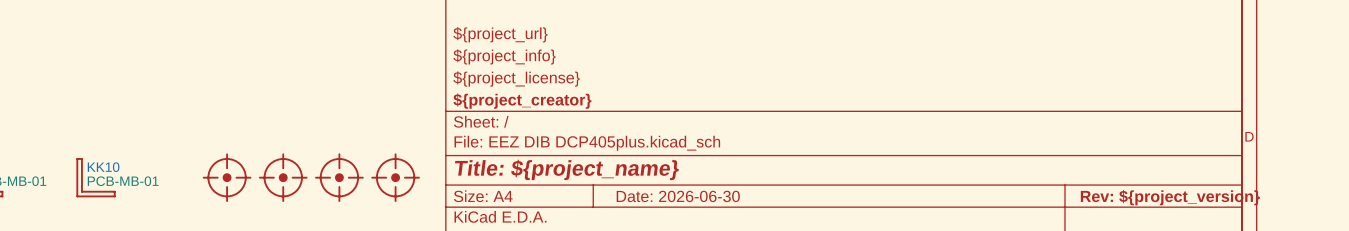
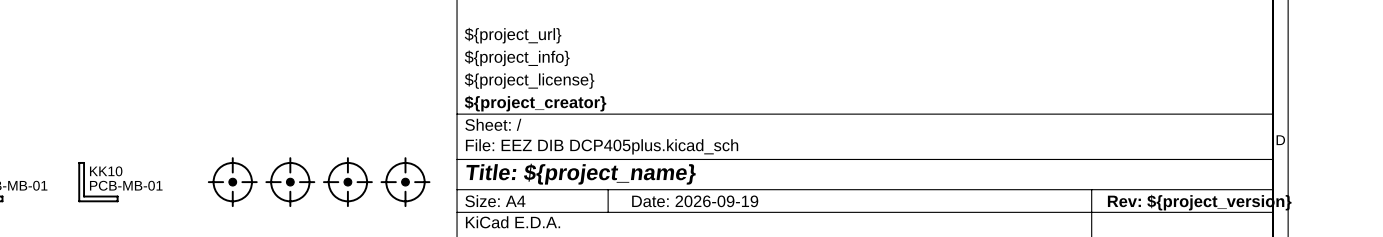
title block: Date: 2026-06-30 (678, 196) -> Date: 2026-09-19 (695, 201)

